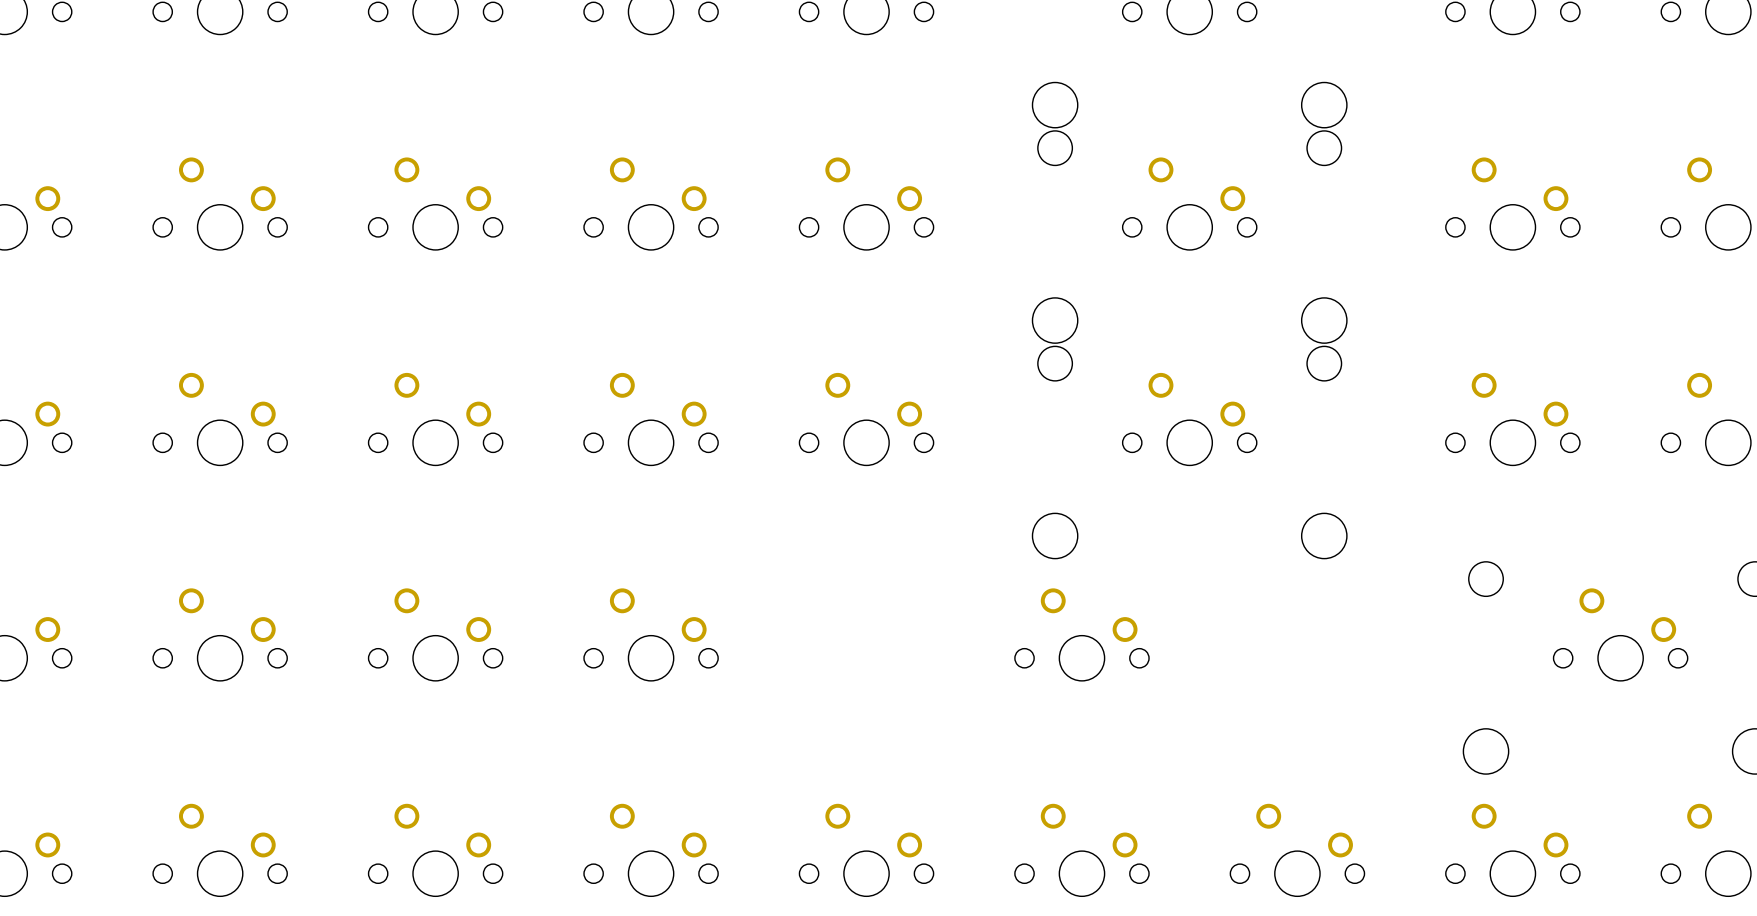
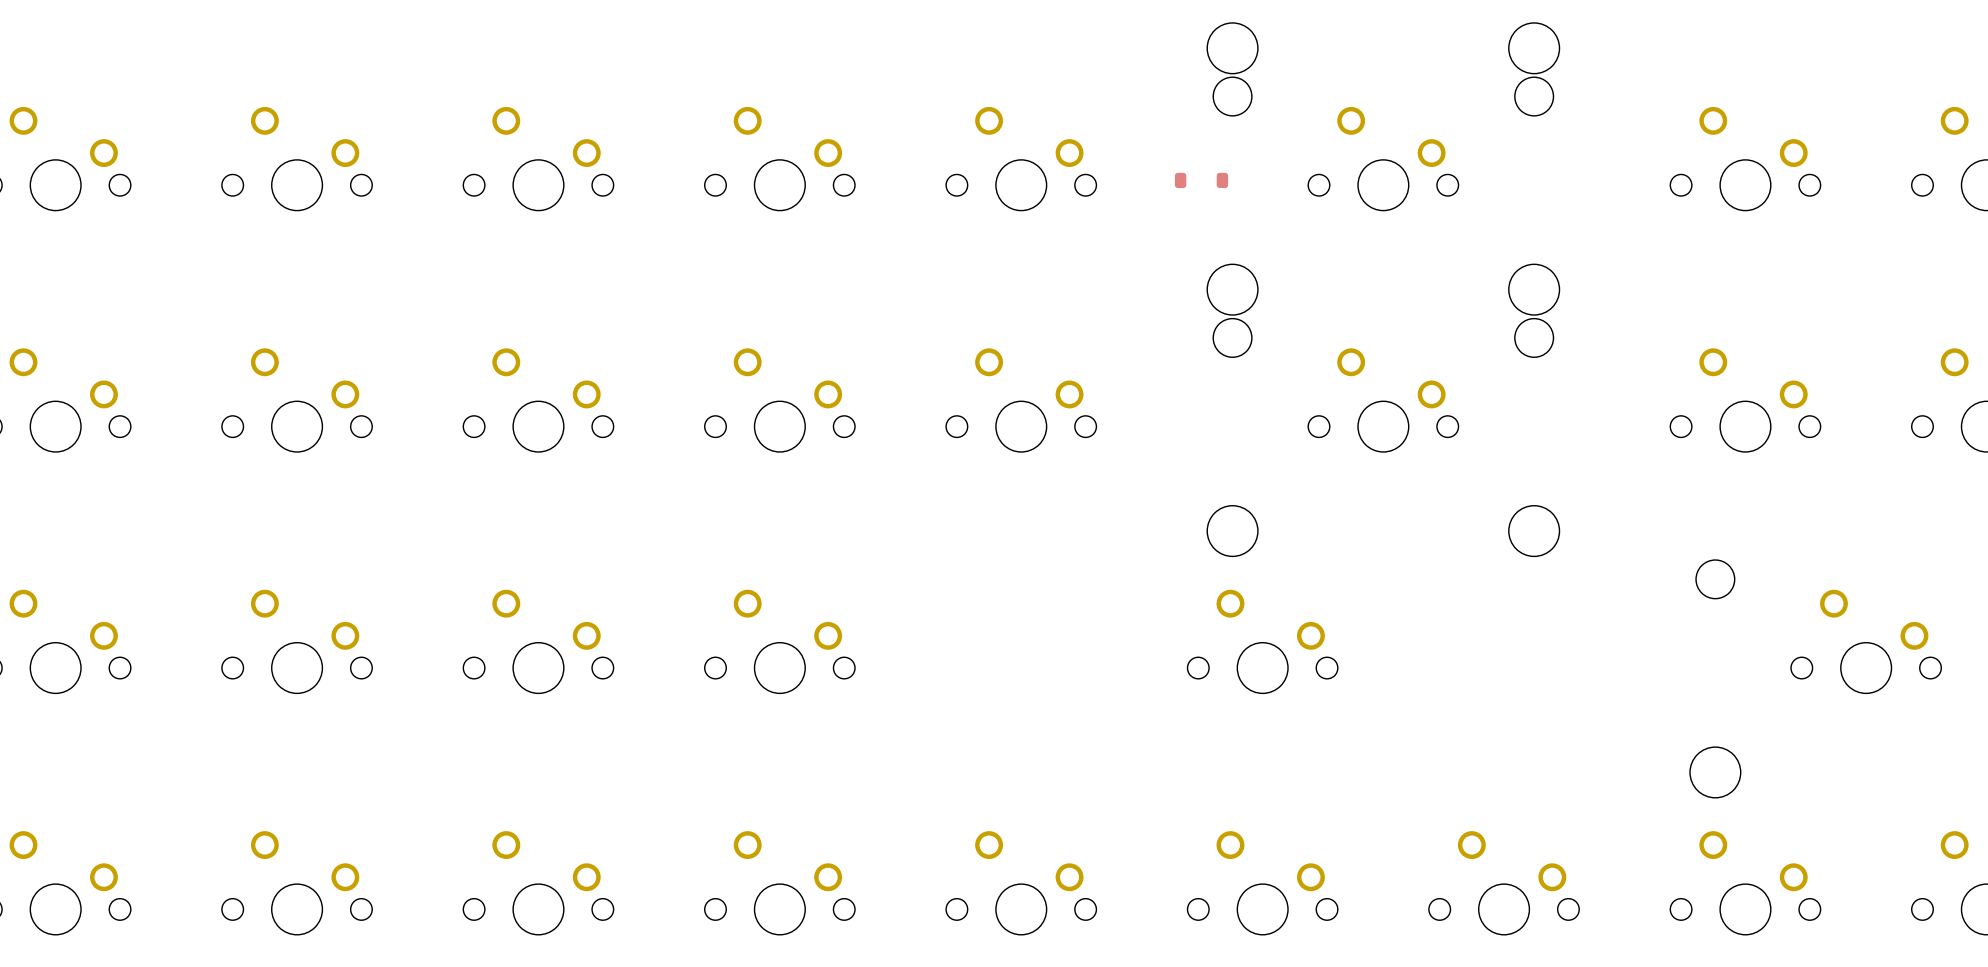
part: none -> (1201, 180)

